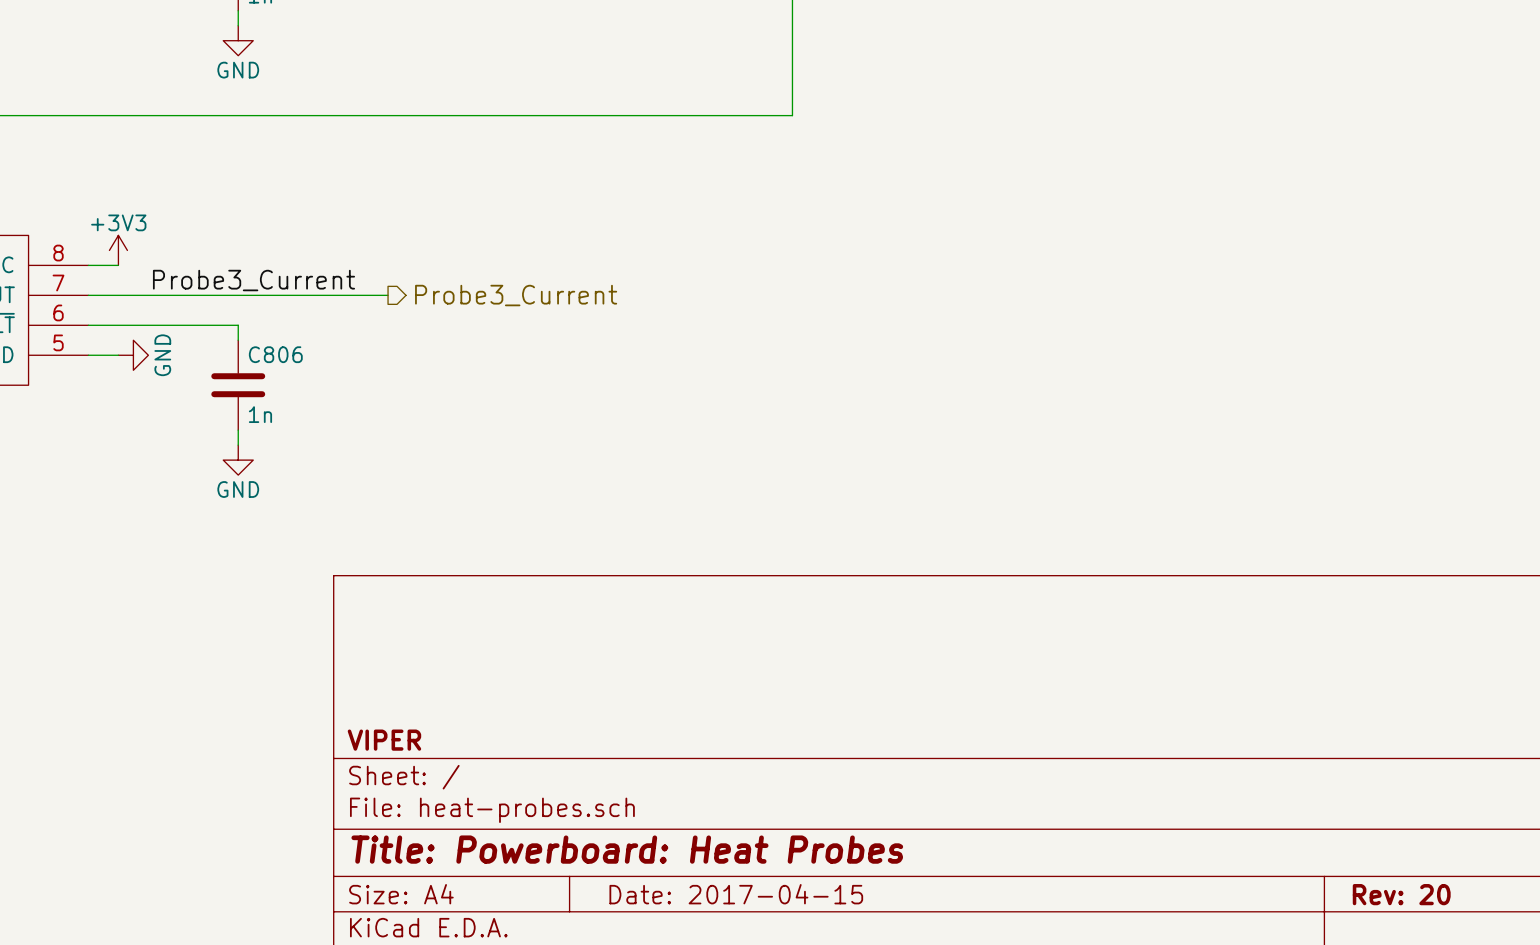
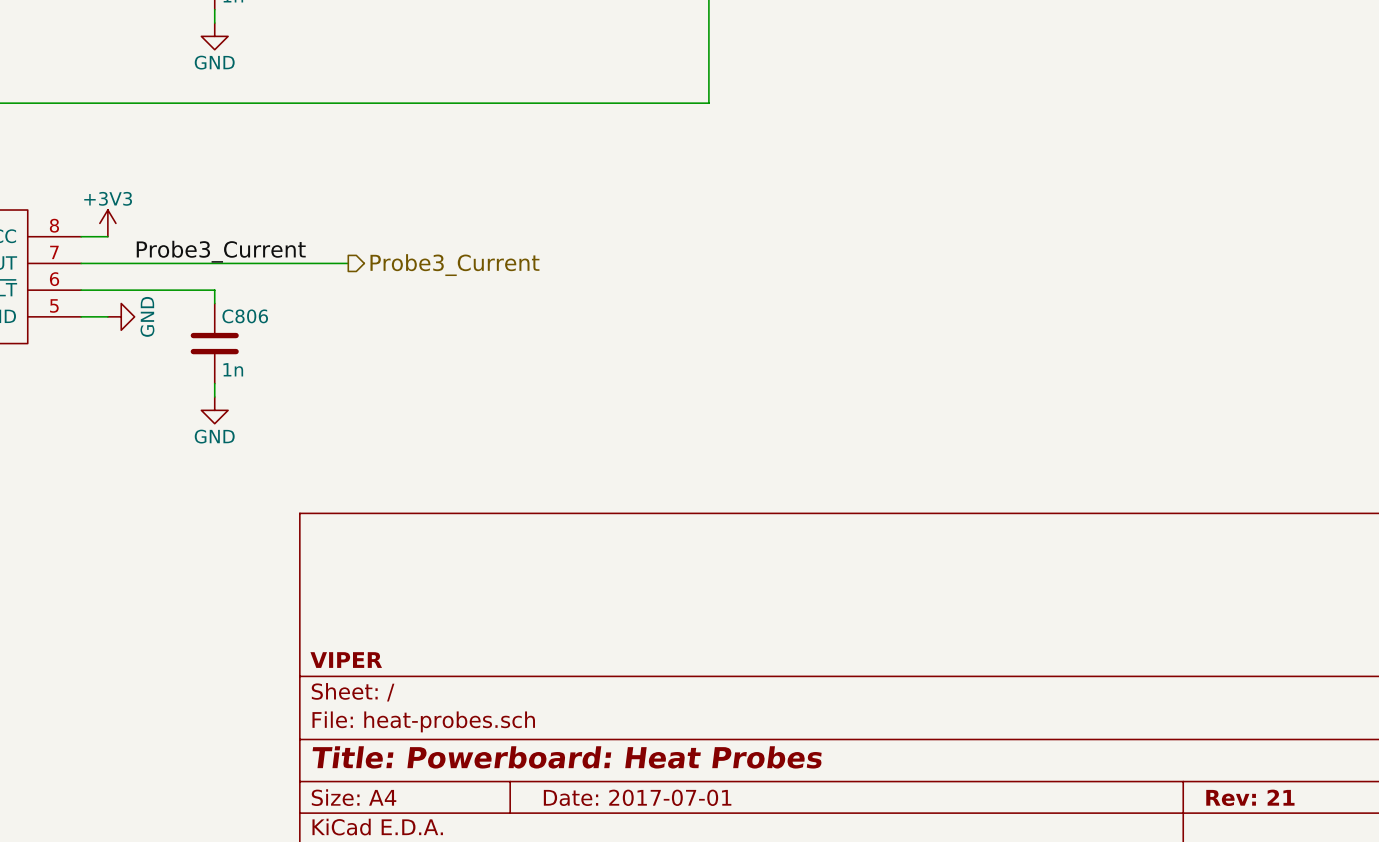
title block: Date: 2017-04-15 (736, 894) -> Date: 2017-07-01 (637, 797)
title block: Rev: 20 (1401, 894) -> Rev: 21 (1250, 797)

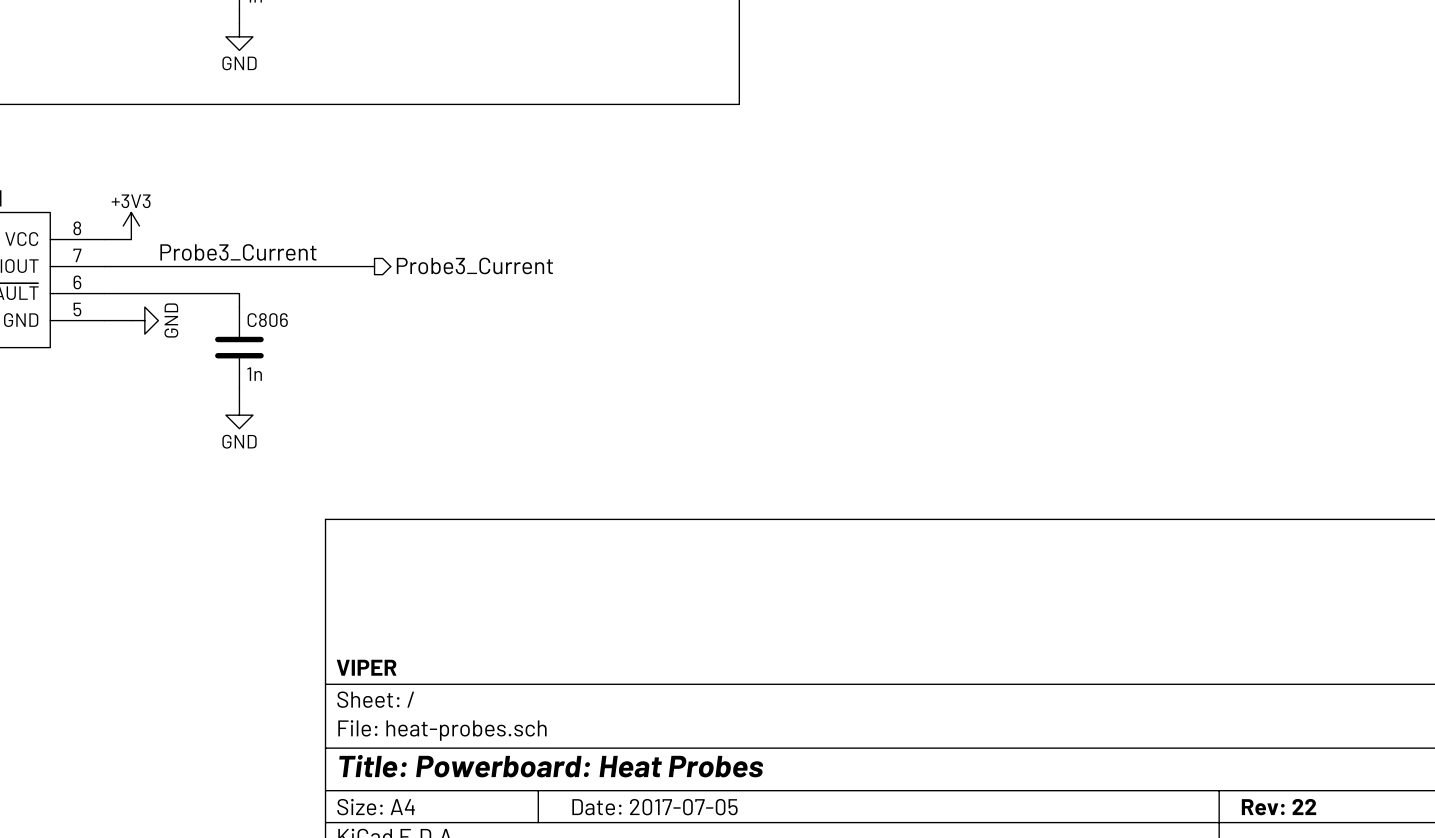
title block: Date: 2017-07-01 (637, 797) -> Date: 2017-07-05 (654, 807)
title block: Rev: 21 (1250, 797) -> Rev: 22 (1279, 807)

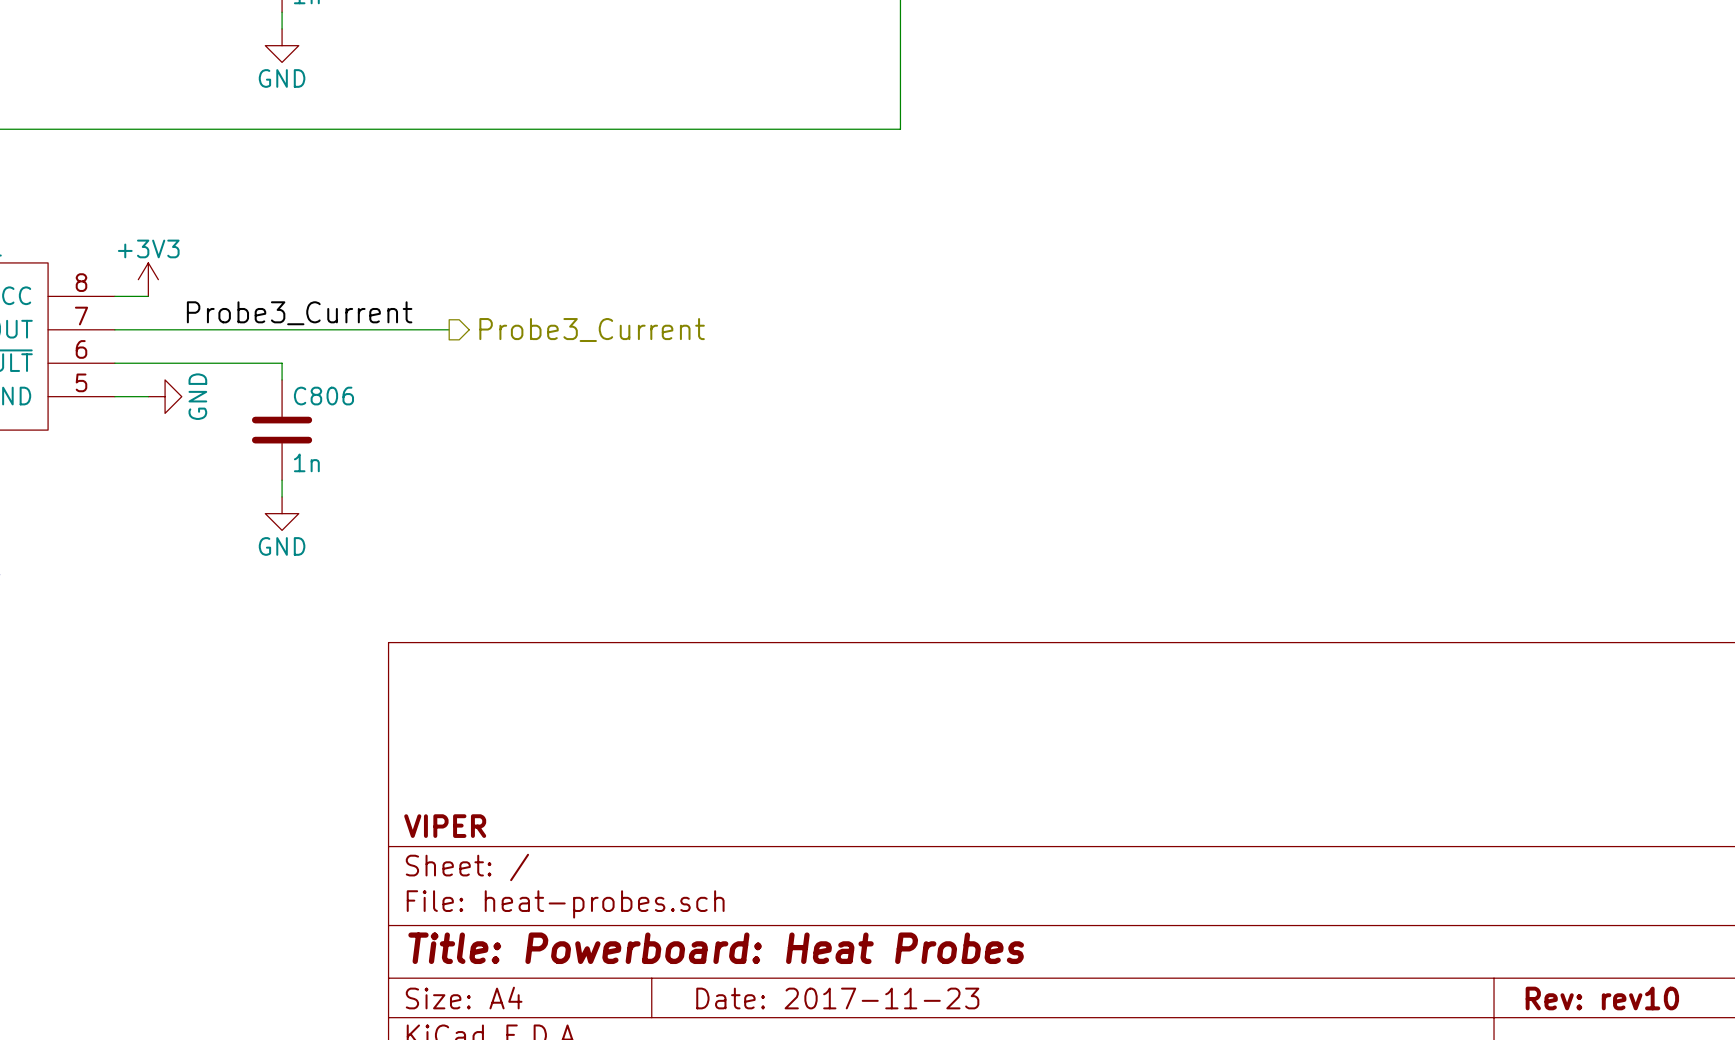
title block: Date: 2017-07-05 (654, 807) -> Date: 2017-11-23 (837, 998)
title block: Rev: 22 (1279, 807) -> Rev: rev10 (1602, 998)

